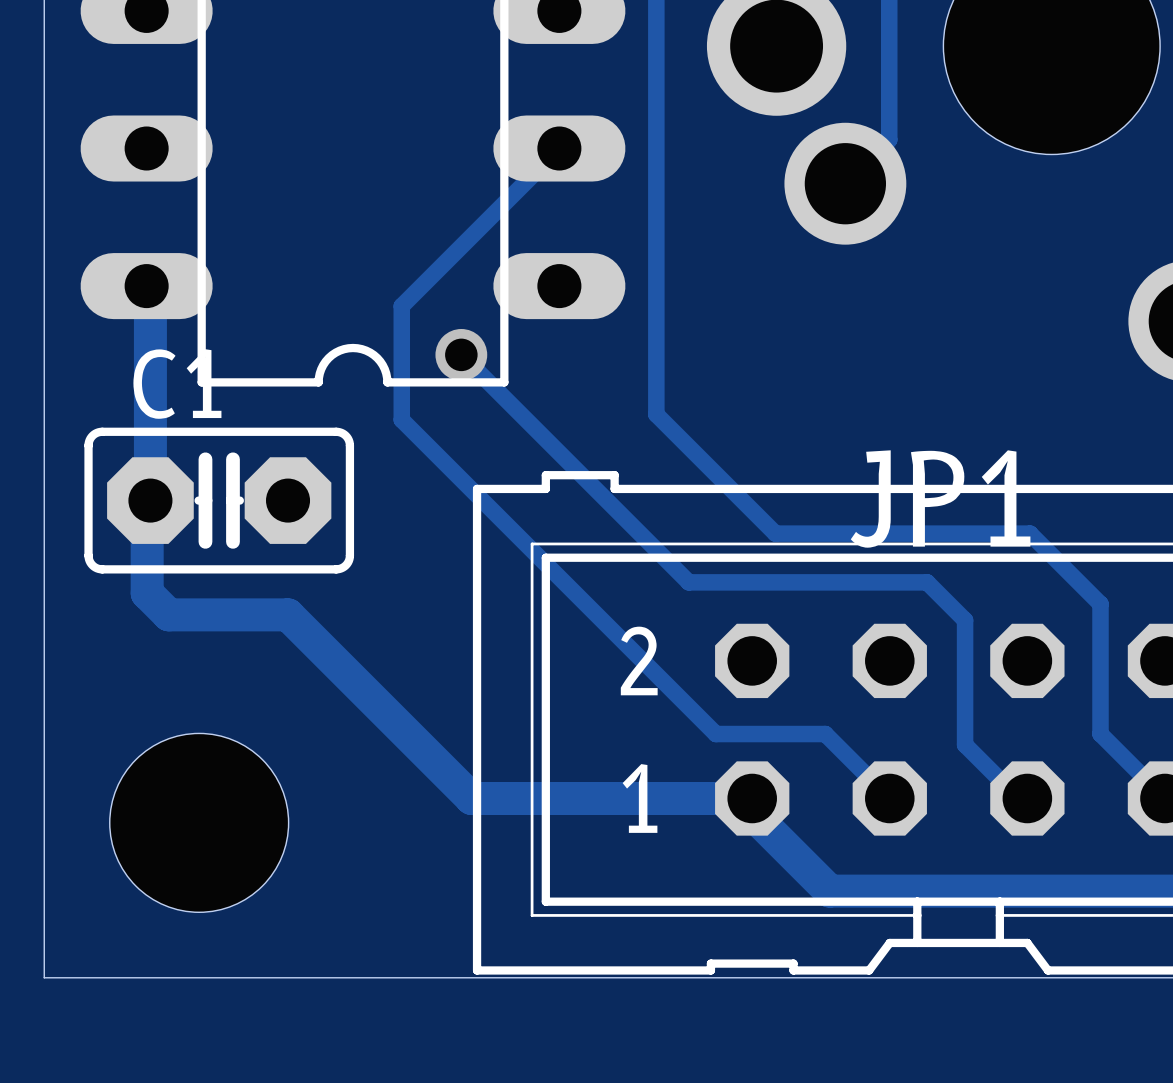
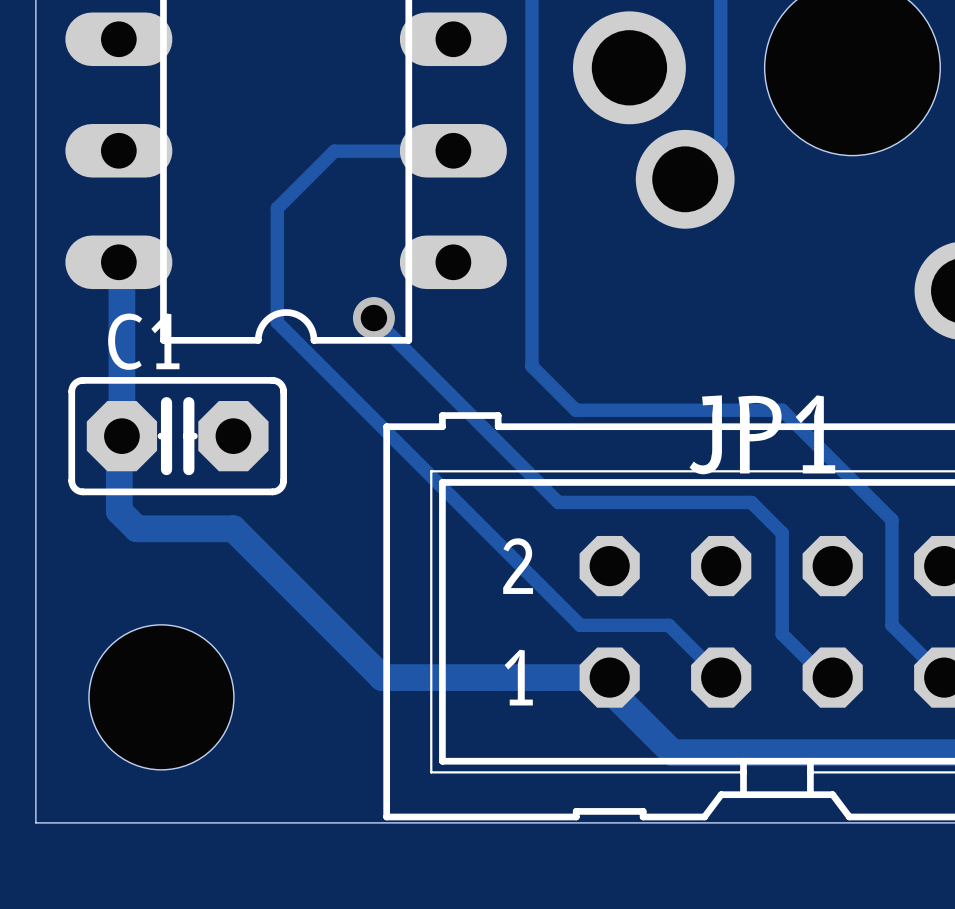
track: (558, 149) (401, 306) (401, 419) -> (452, 151) (334, 151) (277, 208) (277, 322) (325, 370)
track: (710, 468) (775, 533) (1030, 533) -> (575, 410) (782, 410) (834, 462)

